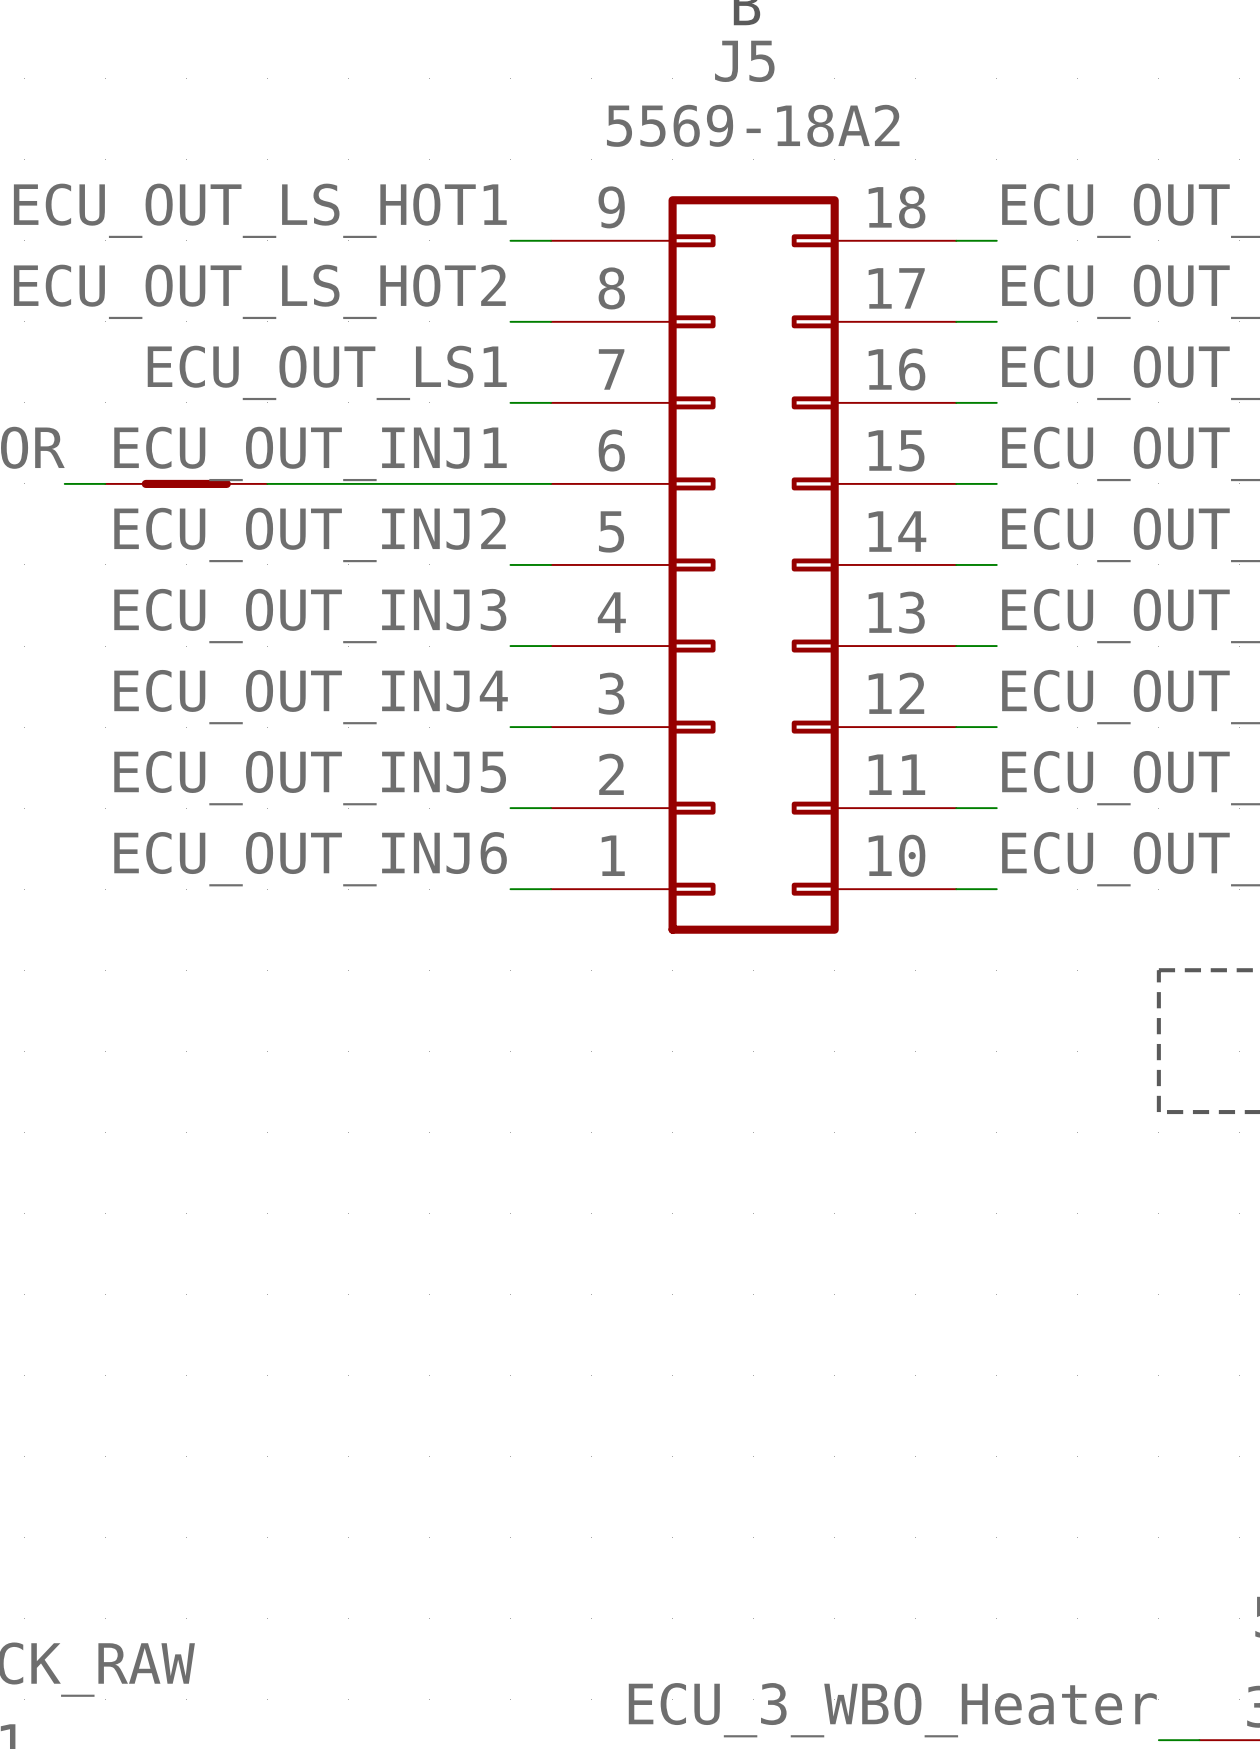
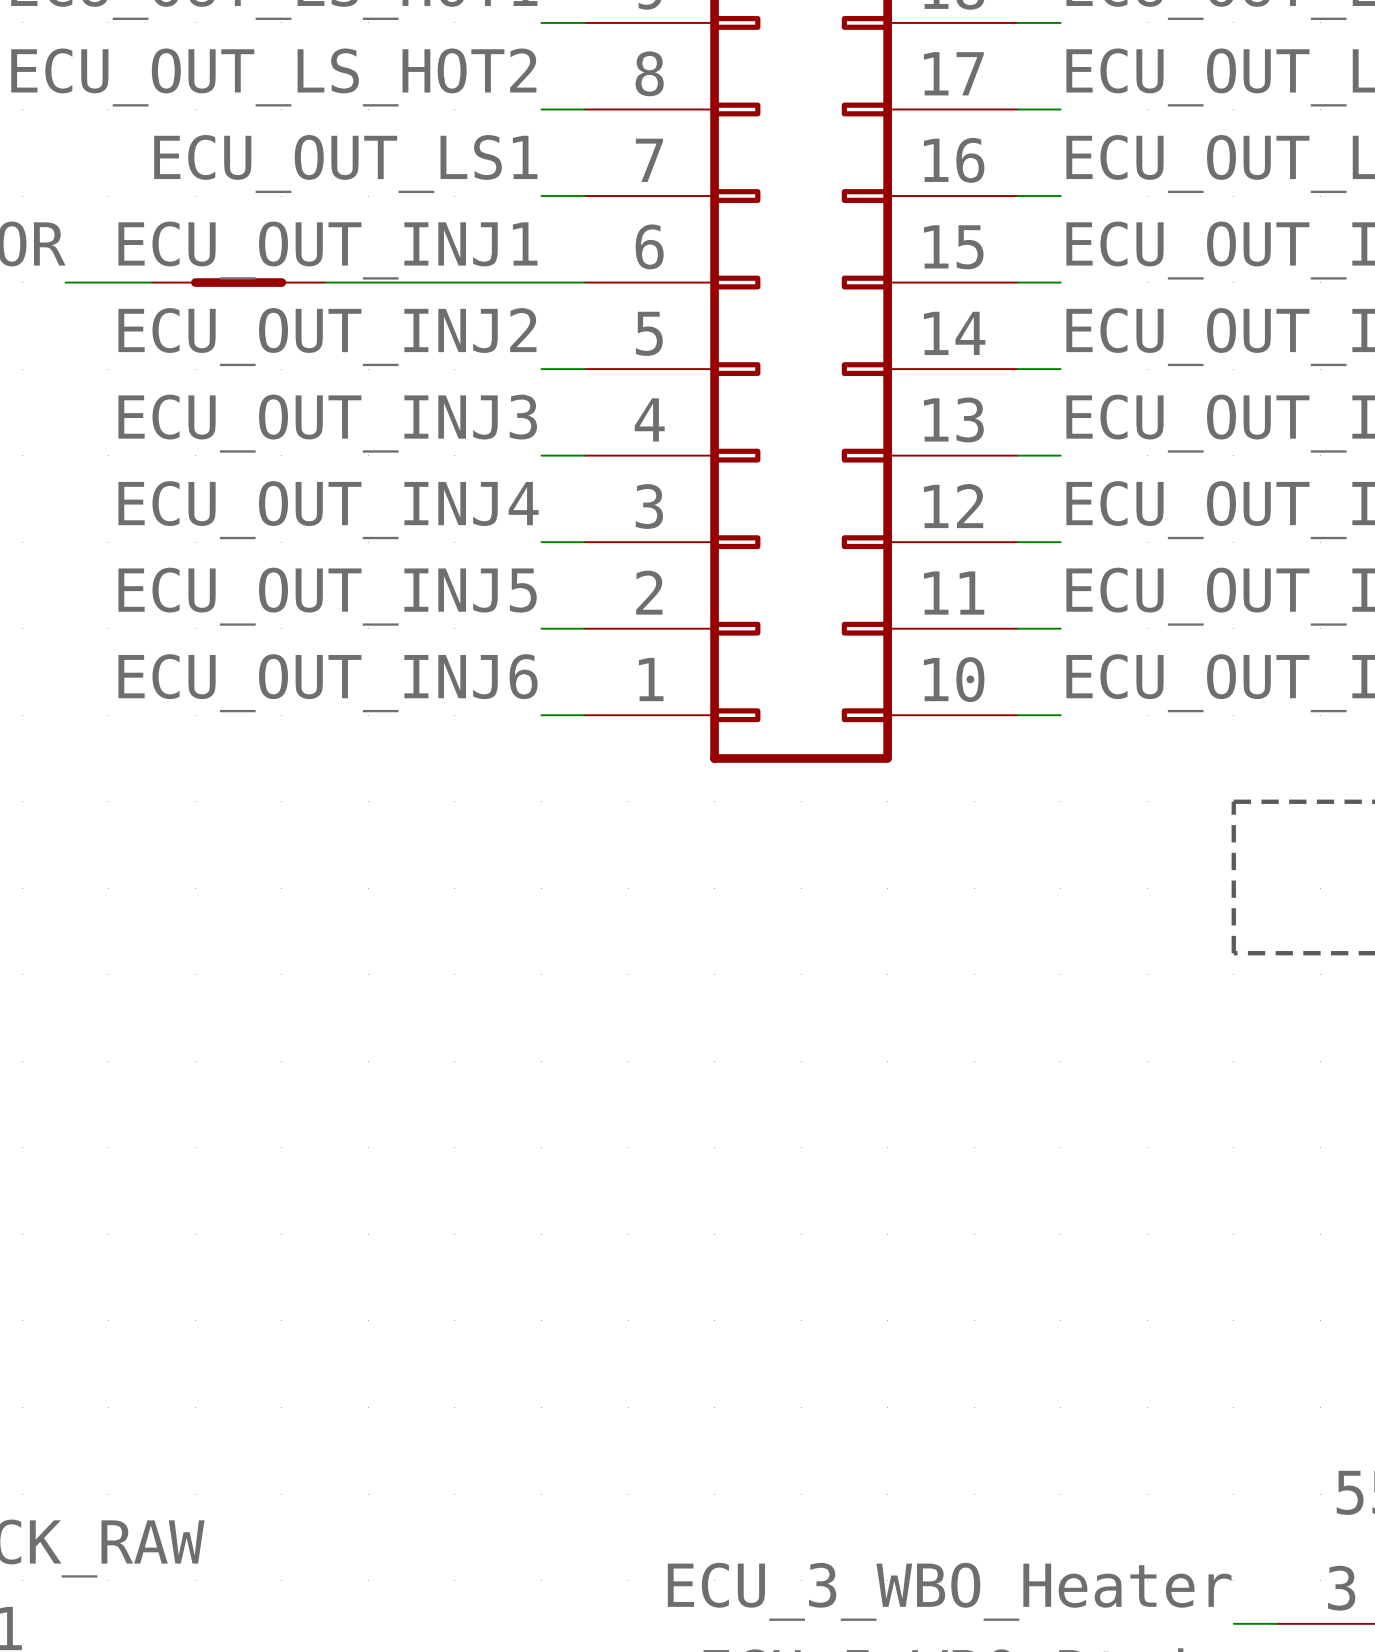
part position: (186, 483) -> (238, 282)

